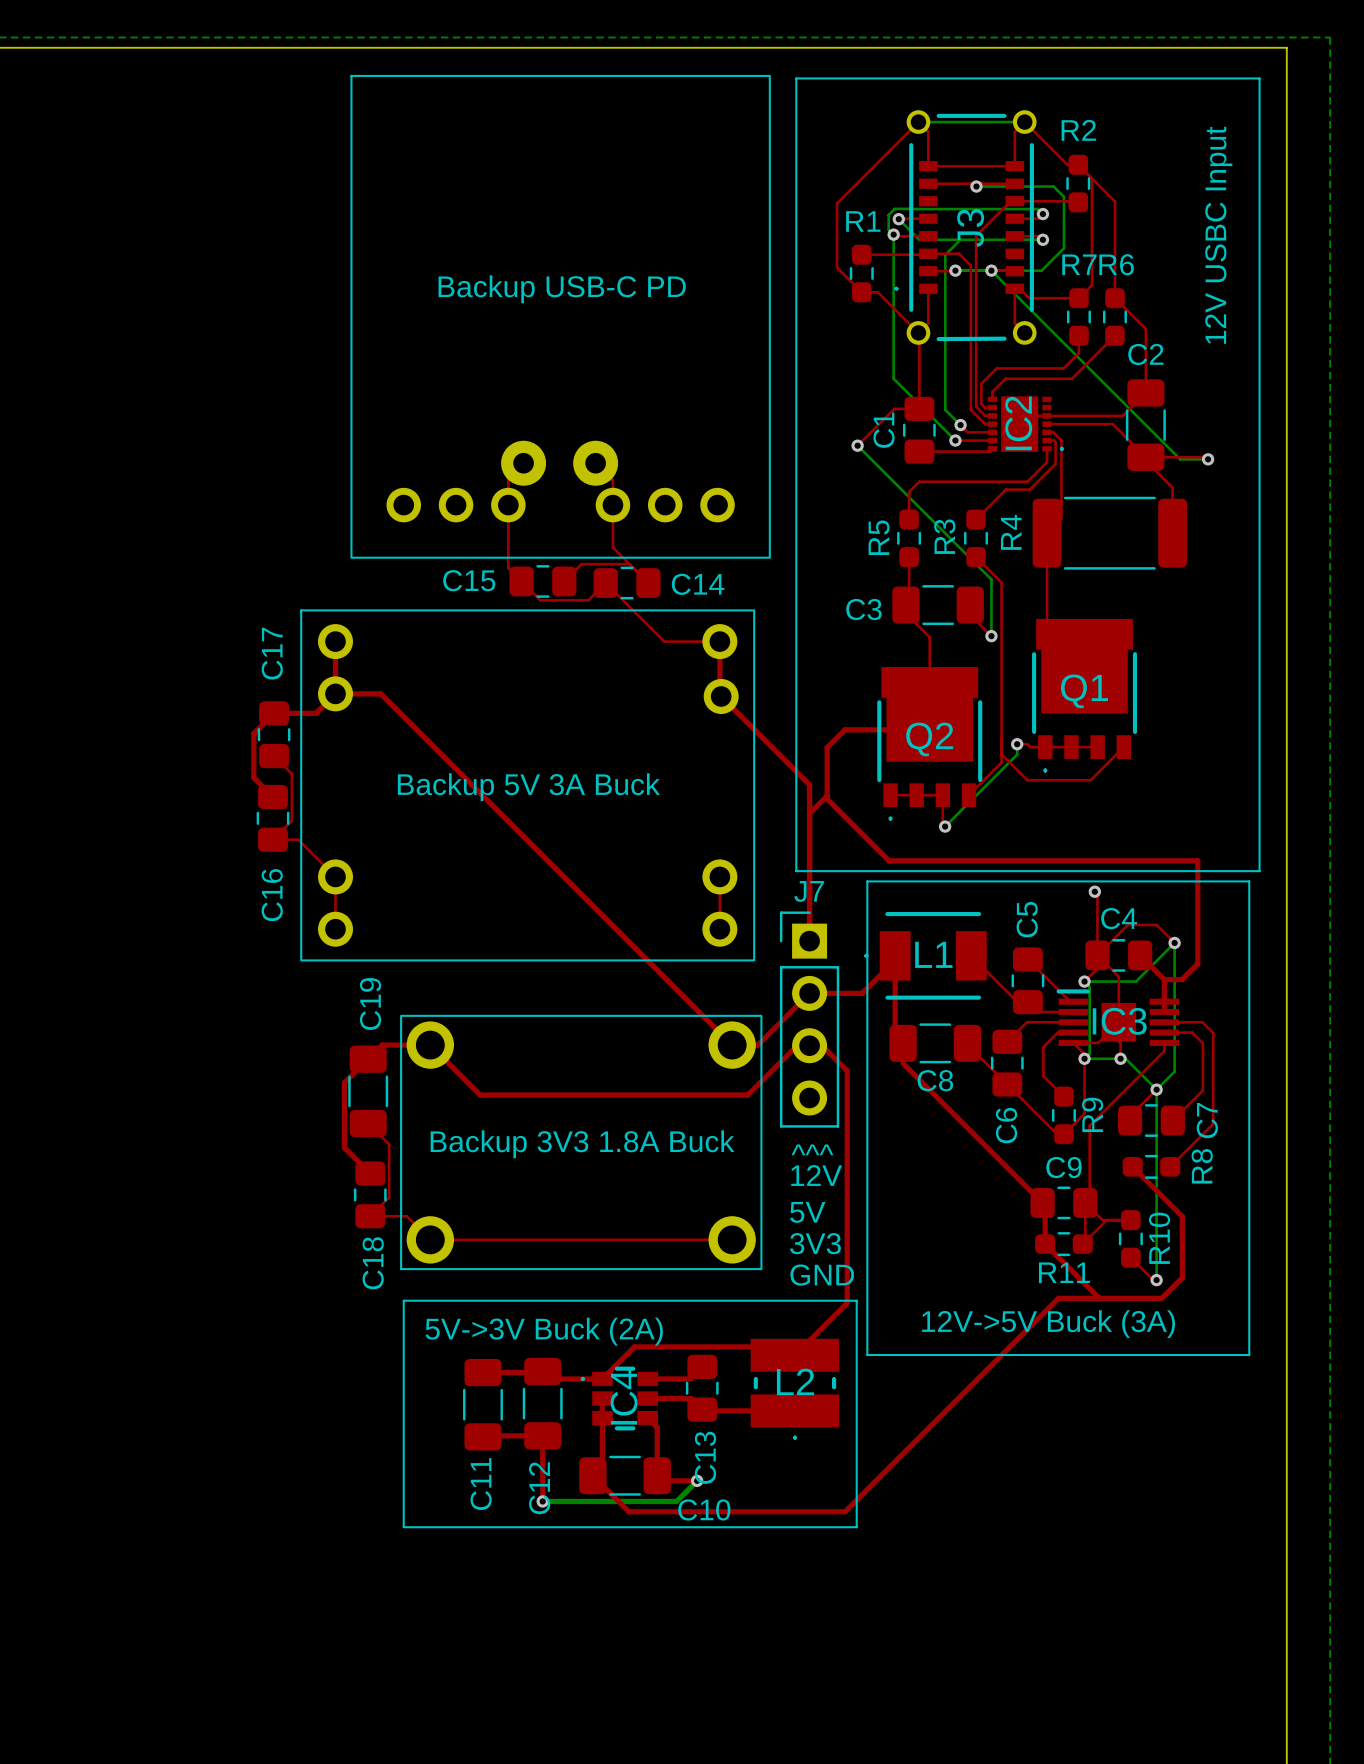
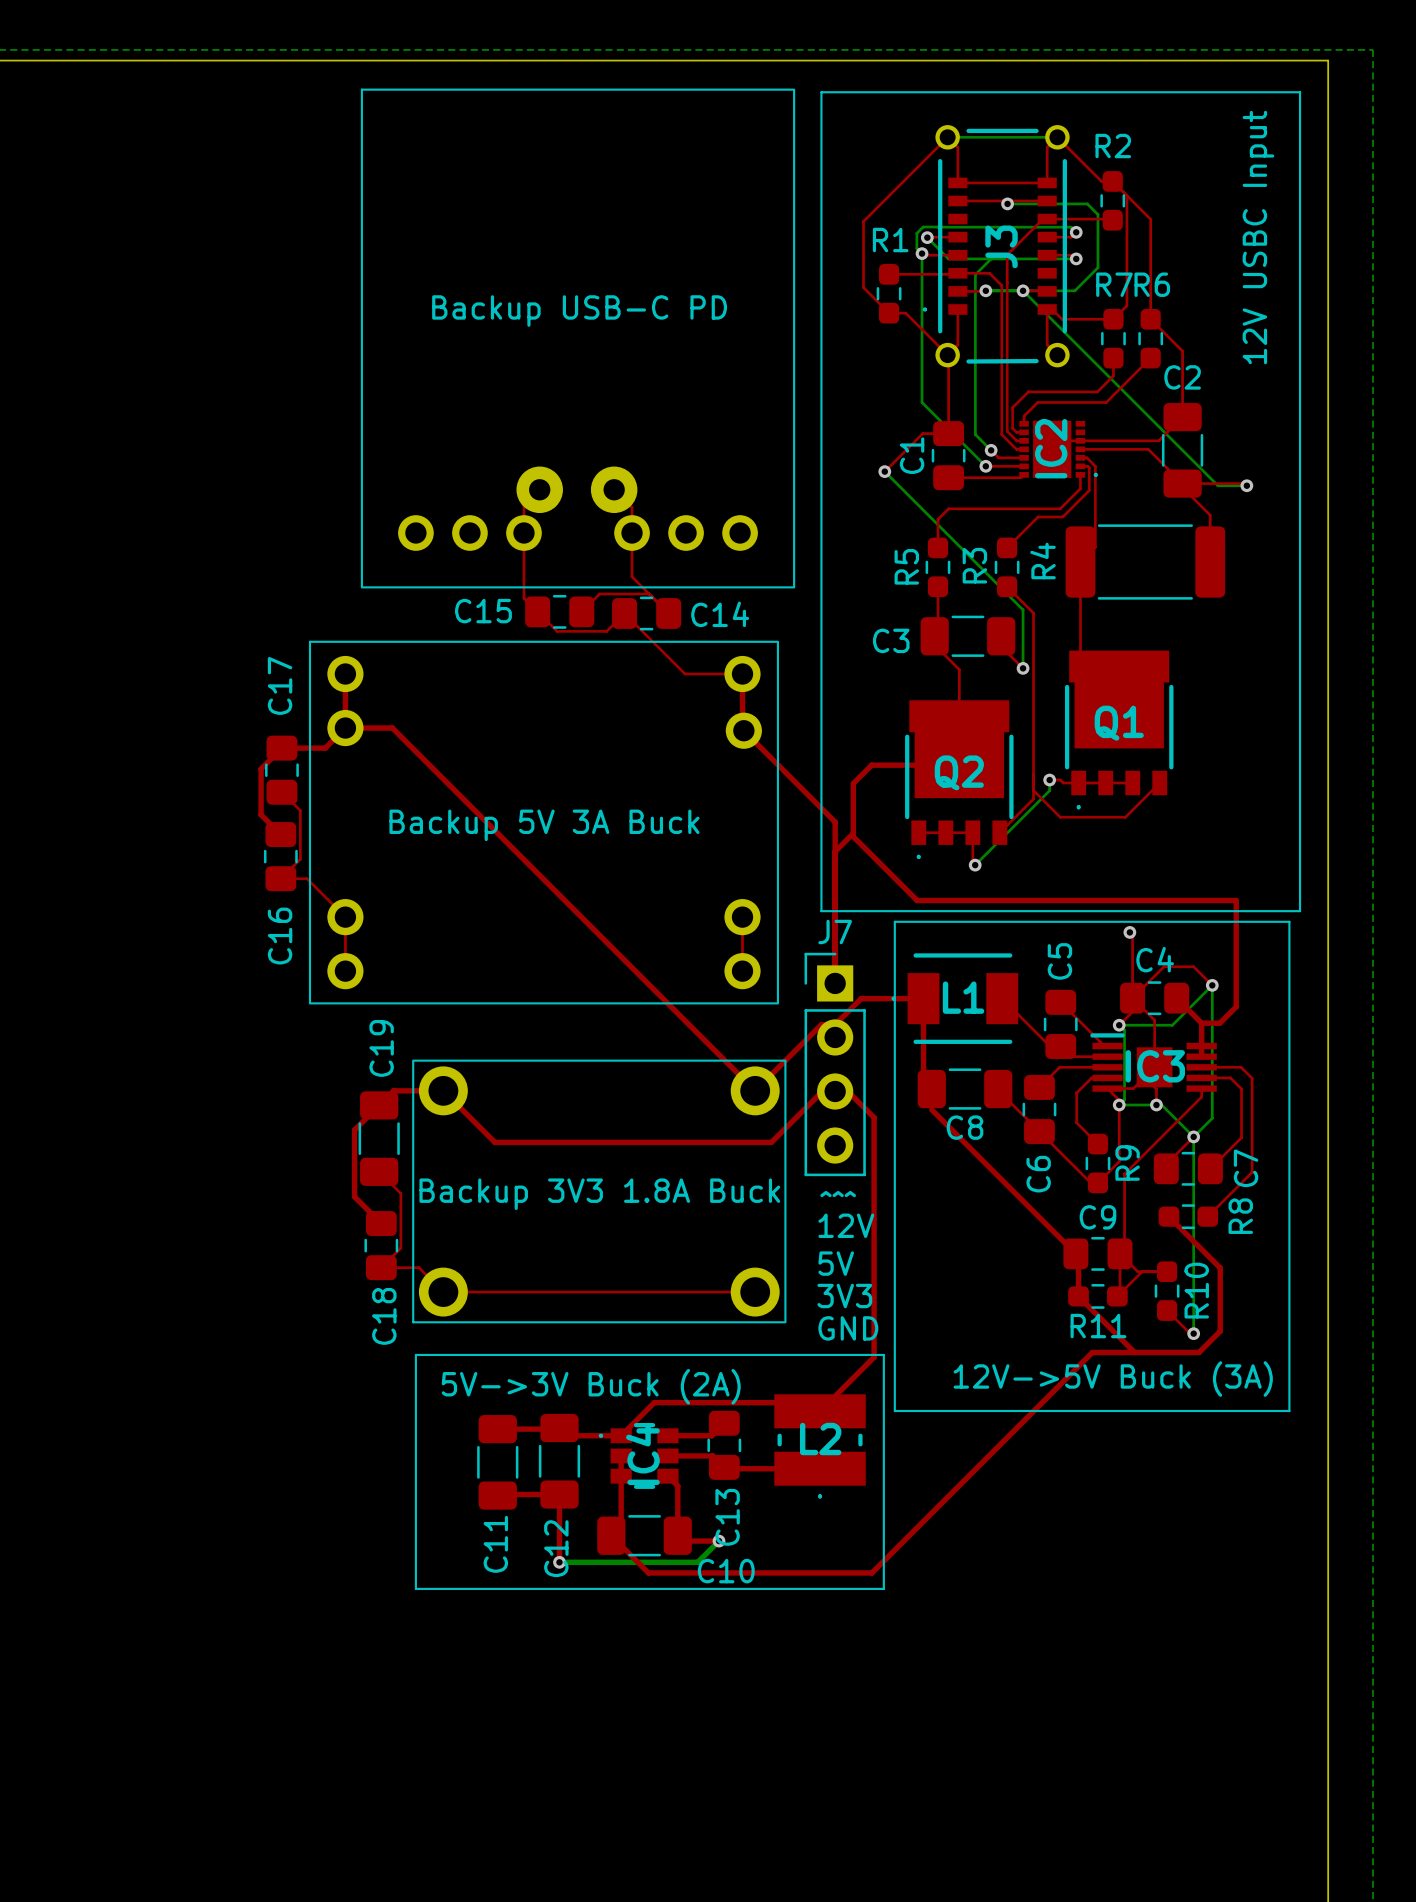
top track: (895, 960) (862, 993) (809, 993) (757, 1045) (732, 1045) -> (923, 998) (861, 998) (835, 1024) (821, 1024) (755, 1090)

